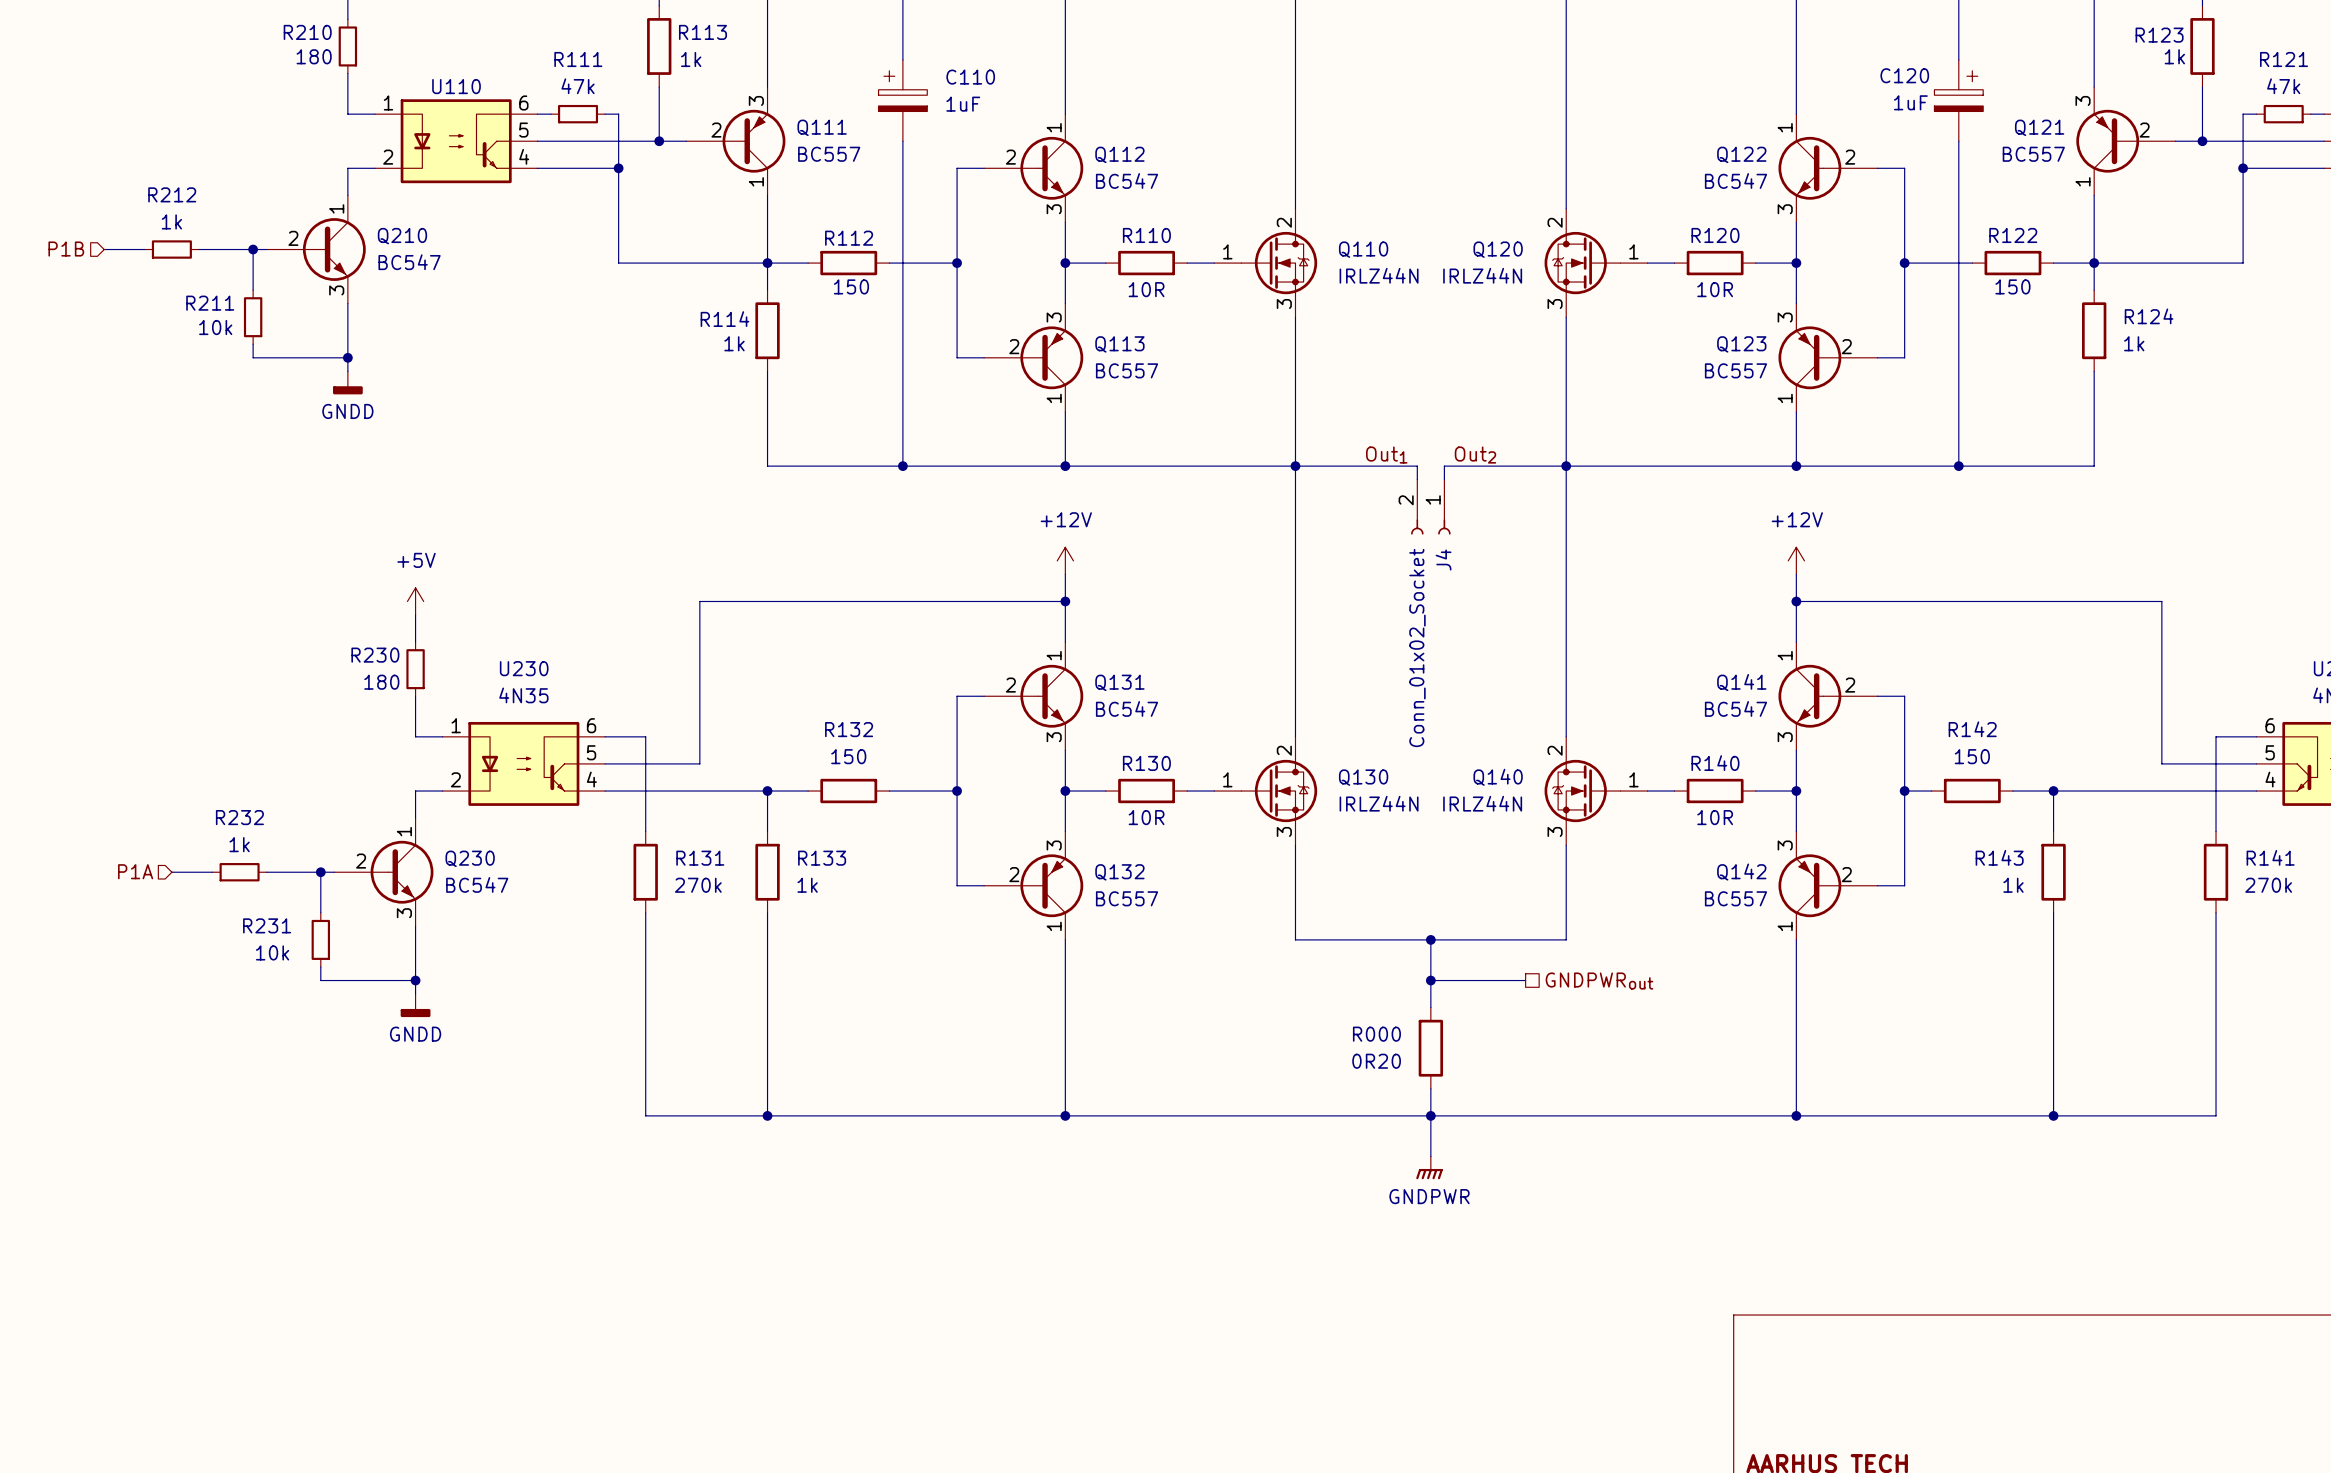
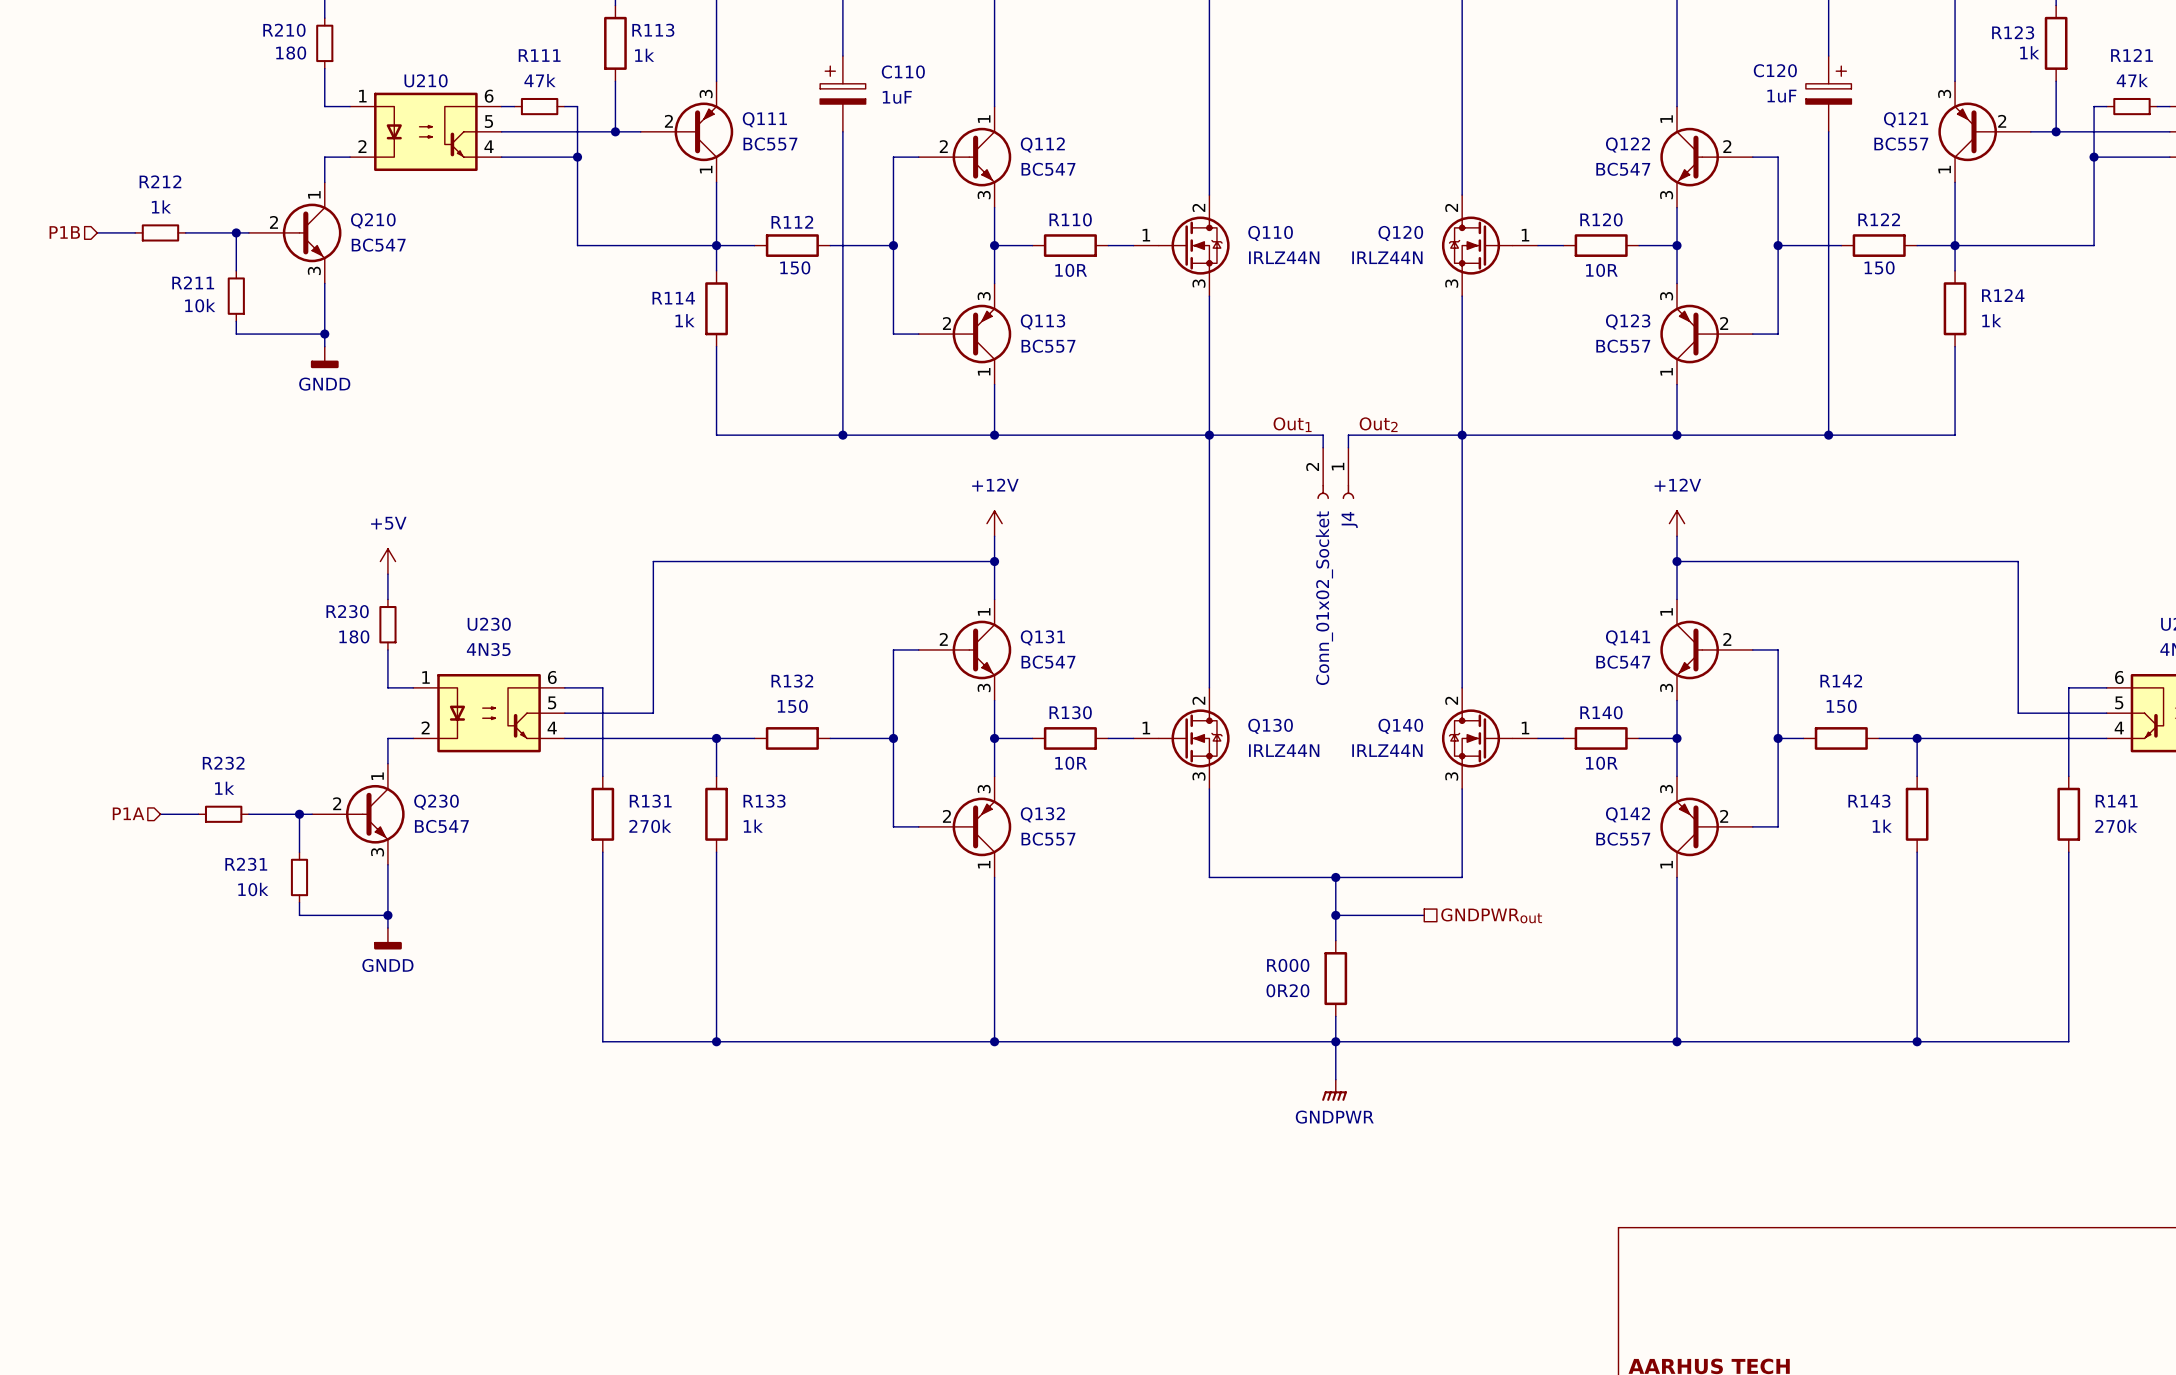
U110 name: U110 (456, 86) -> U210 (426, 80)

